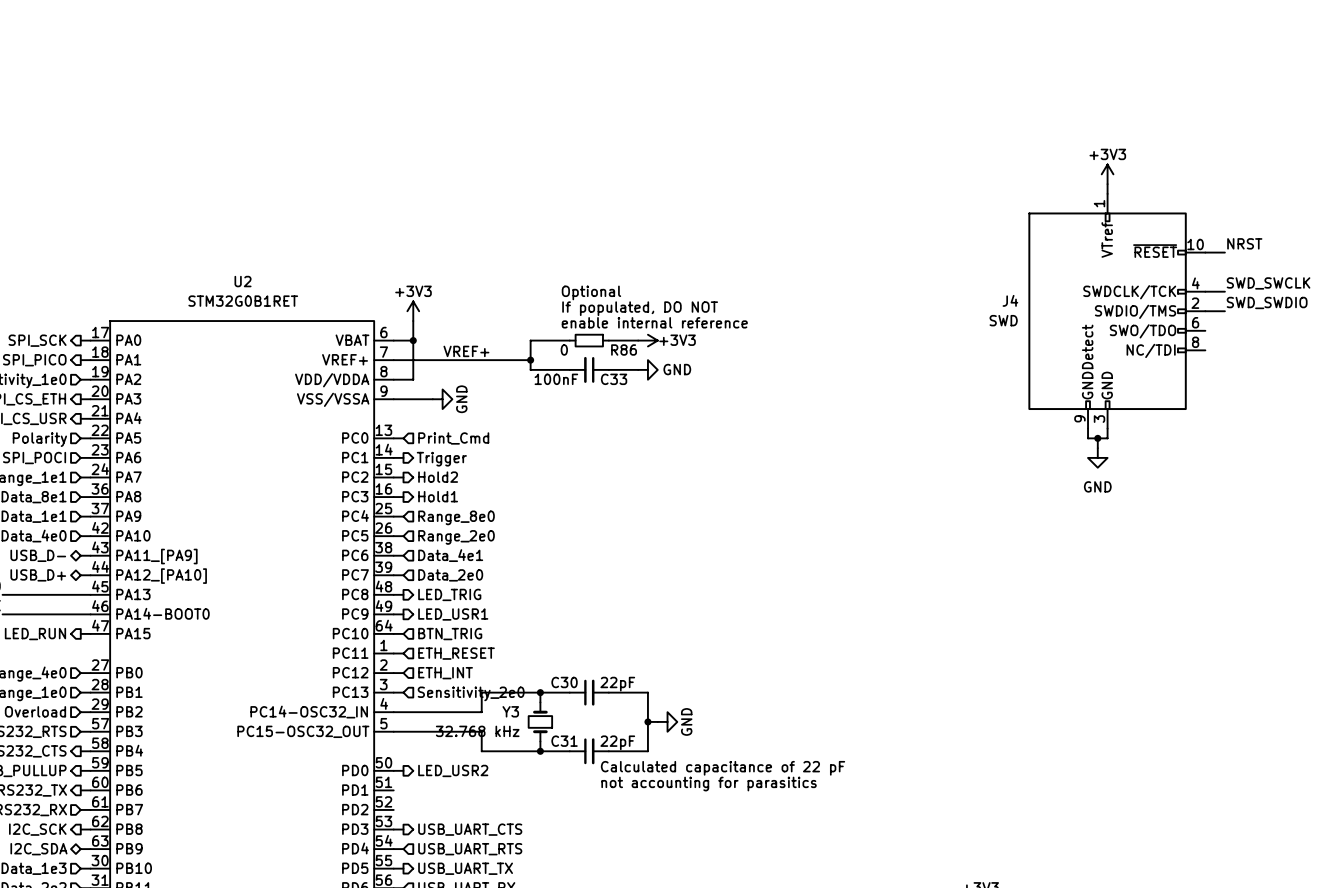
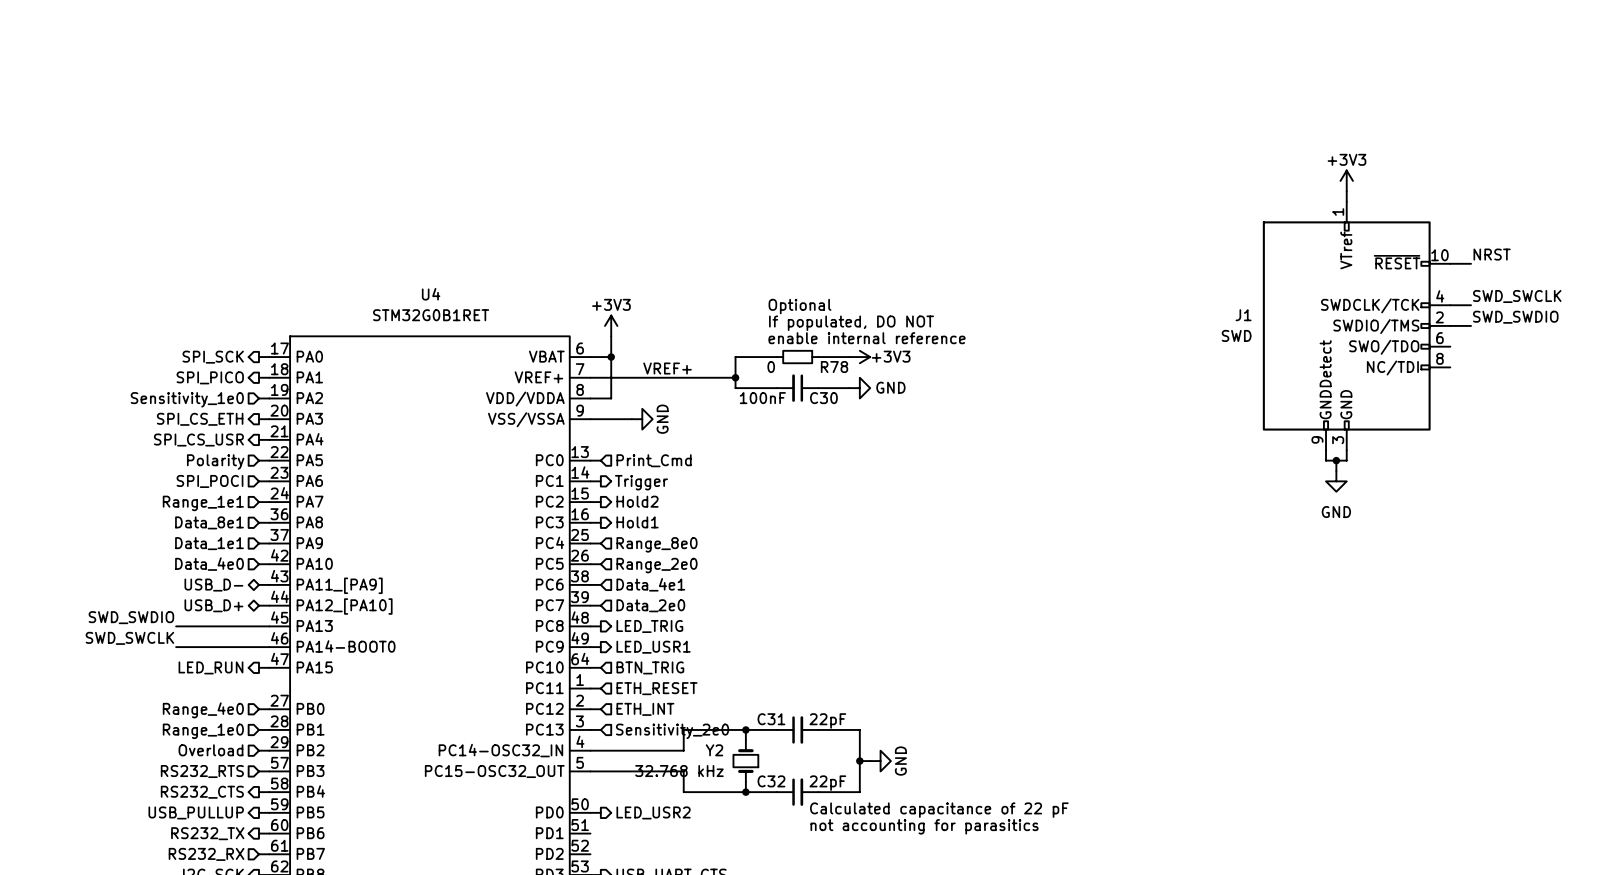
U2 name: U2 (243, 281) -> U4 (431, 294)
J4 name: J4 (1010, 300) -> J1 (1243, 315)
R86 name: R86 (624, 350) -> R78 (834, 367)
C33 name: C33 (614, 379) -> C30 (823, 398)
C30 name: C30 (564, 682) -> C31 (771, 719)
Y3 name: Y3 (510, 711) -> Y2 (714, 750)
C31 name: C31 (564, 741) -> C32 (771, 781)

